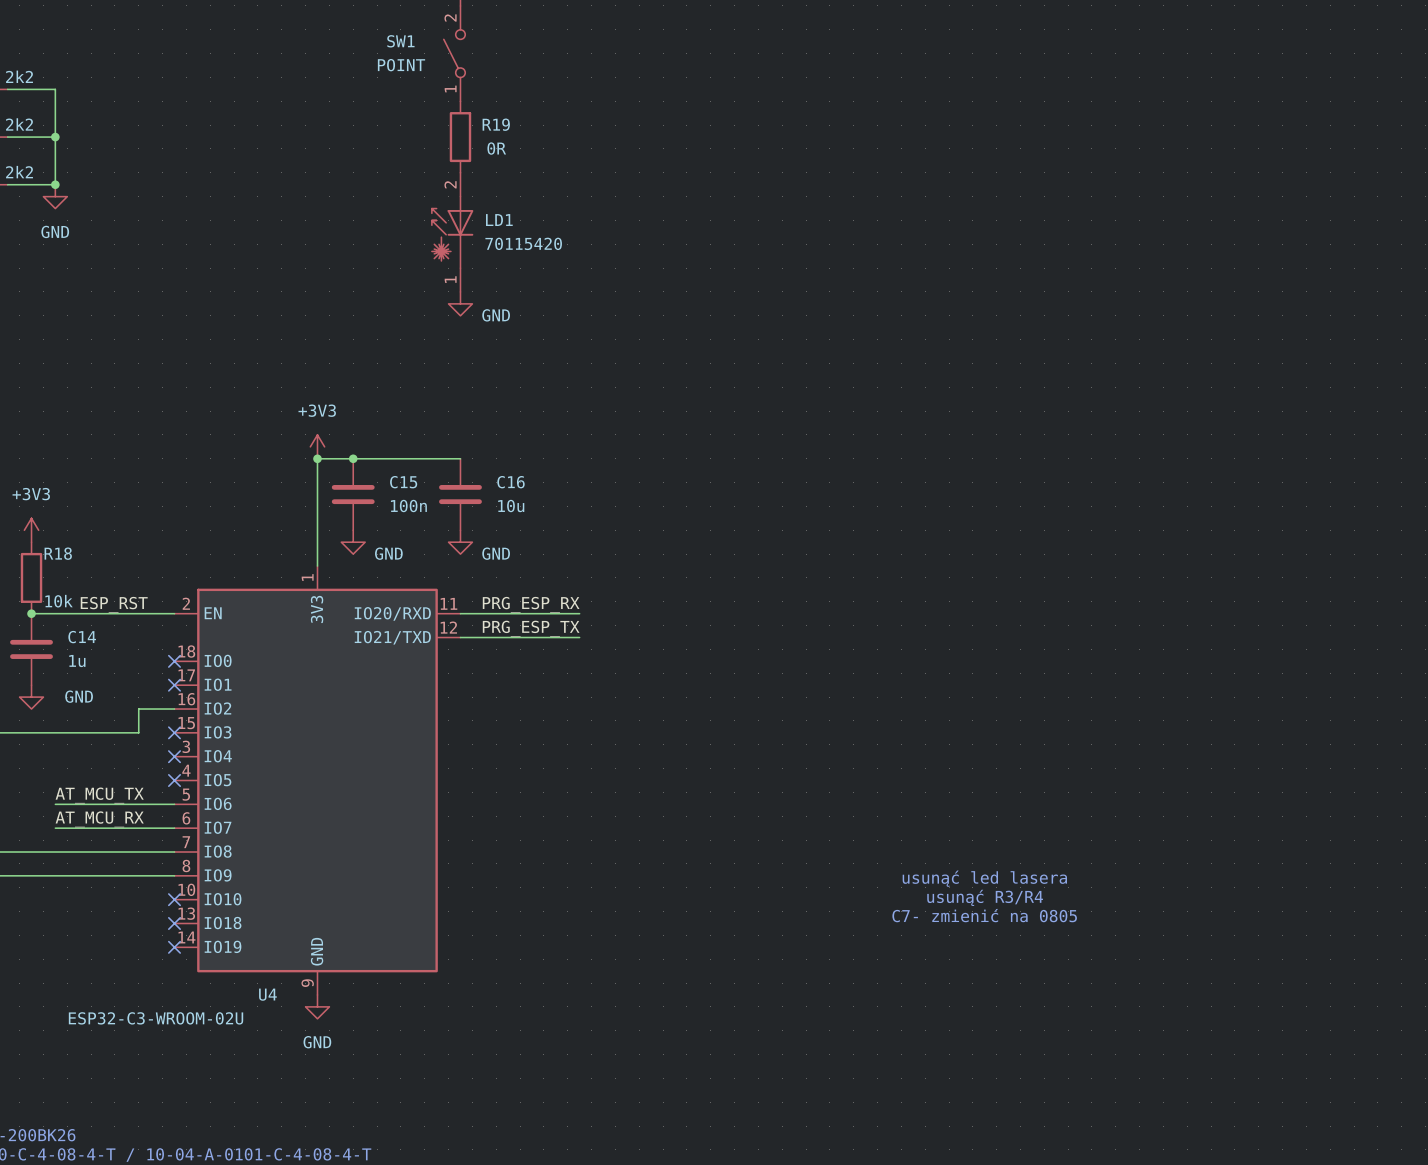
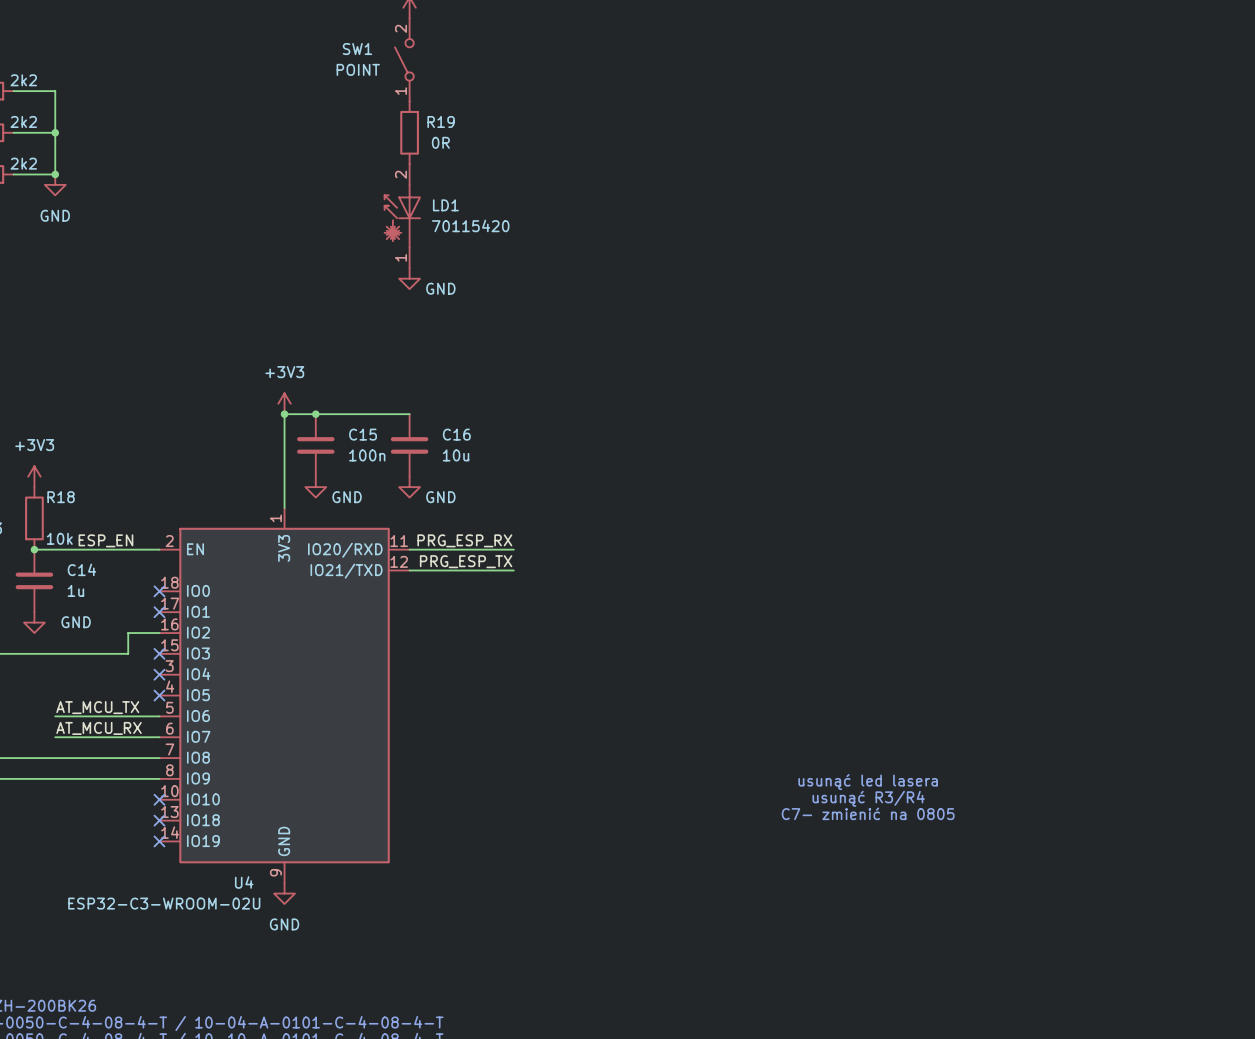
label: ESP_RST (114, 604) -> ESP_EN (105, 540)

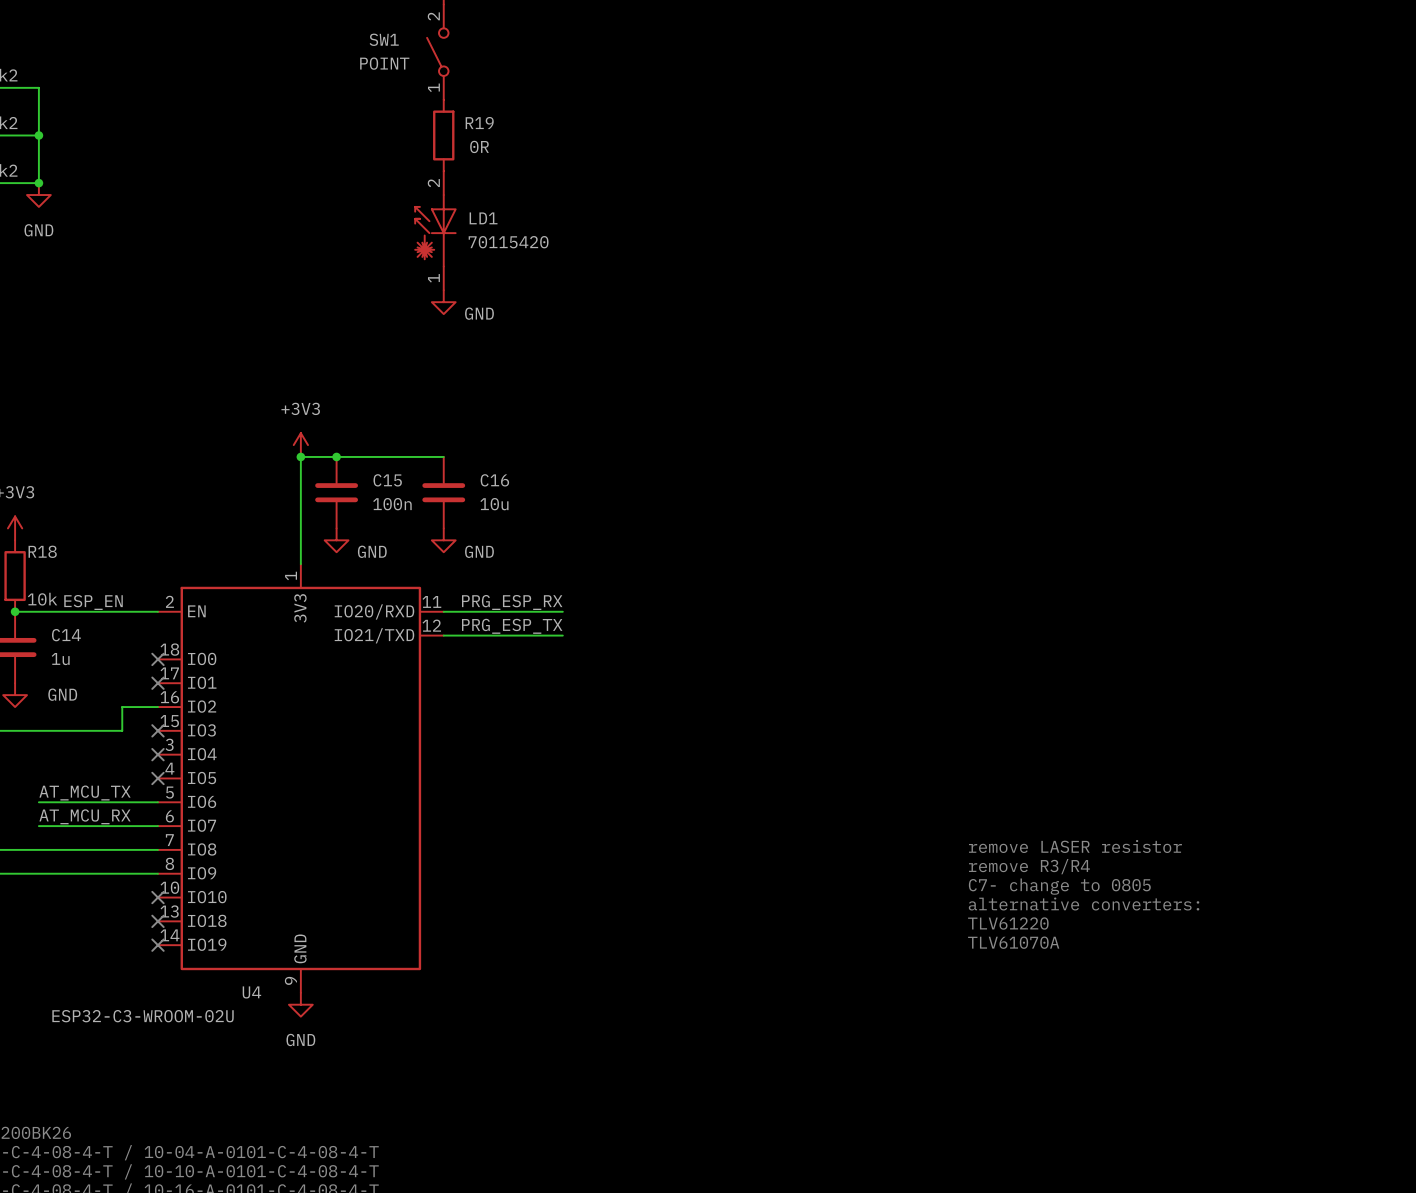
text: none -> remove LASER resistor (1075, 846)
text: none -> remove R3/R4 (1029, 866)
text: usunąć led lasera (868, 782) -> none
text: none -> C7- change to 0805 (1059, 886)
text: usunąć R3/R4 (868, 798) -> none
text: none -> alternative converters: (1084, 904)
text: C7- zmienić na 0805 (868, 813) -> none
text: none -> TLV61220 (1008, 923)
text: none -> TLV61070A (1013, 942)

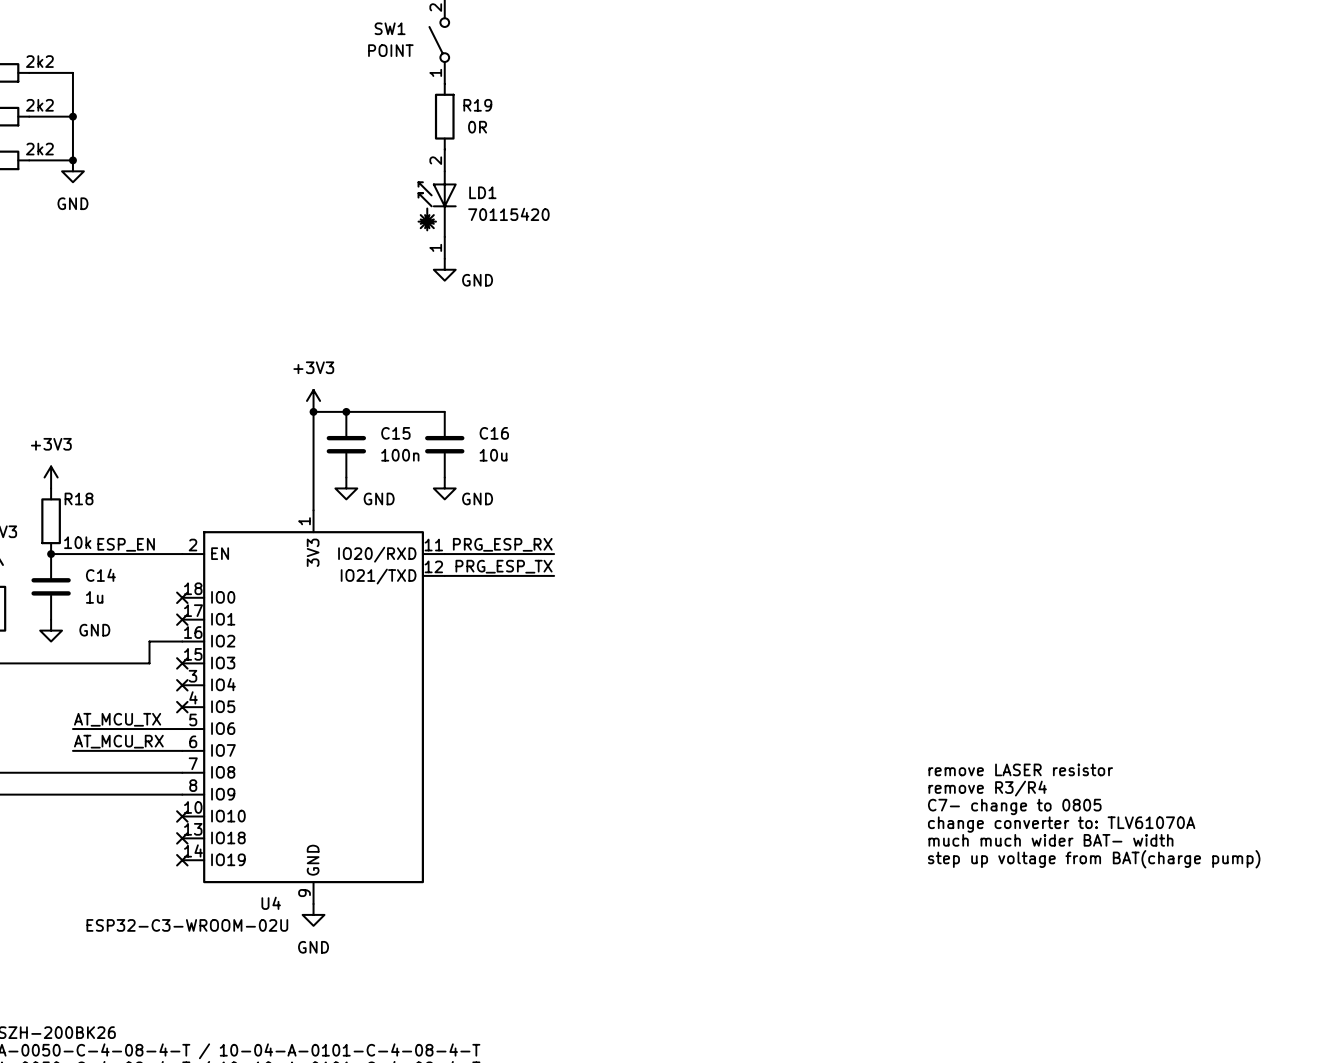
text: alternative converters: (1084, 904) -> change converter to: TLV61070A (1061, 824)
text: TLV61220 (1008, 923) -> much much wider BAT- width (1050, 840)
text: TLV61070A (1013, 942) -> step up voltage from BAT(charge pump) (1094, 859)

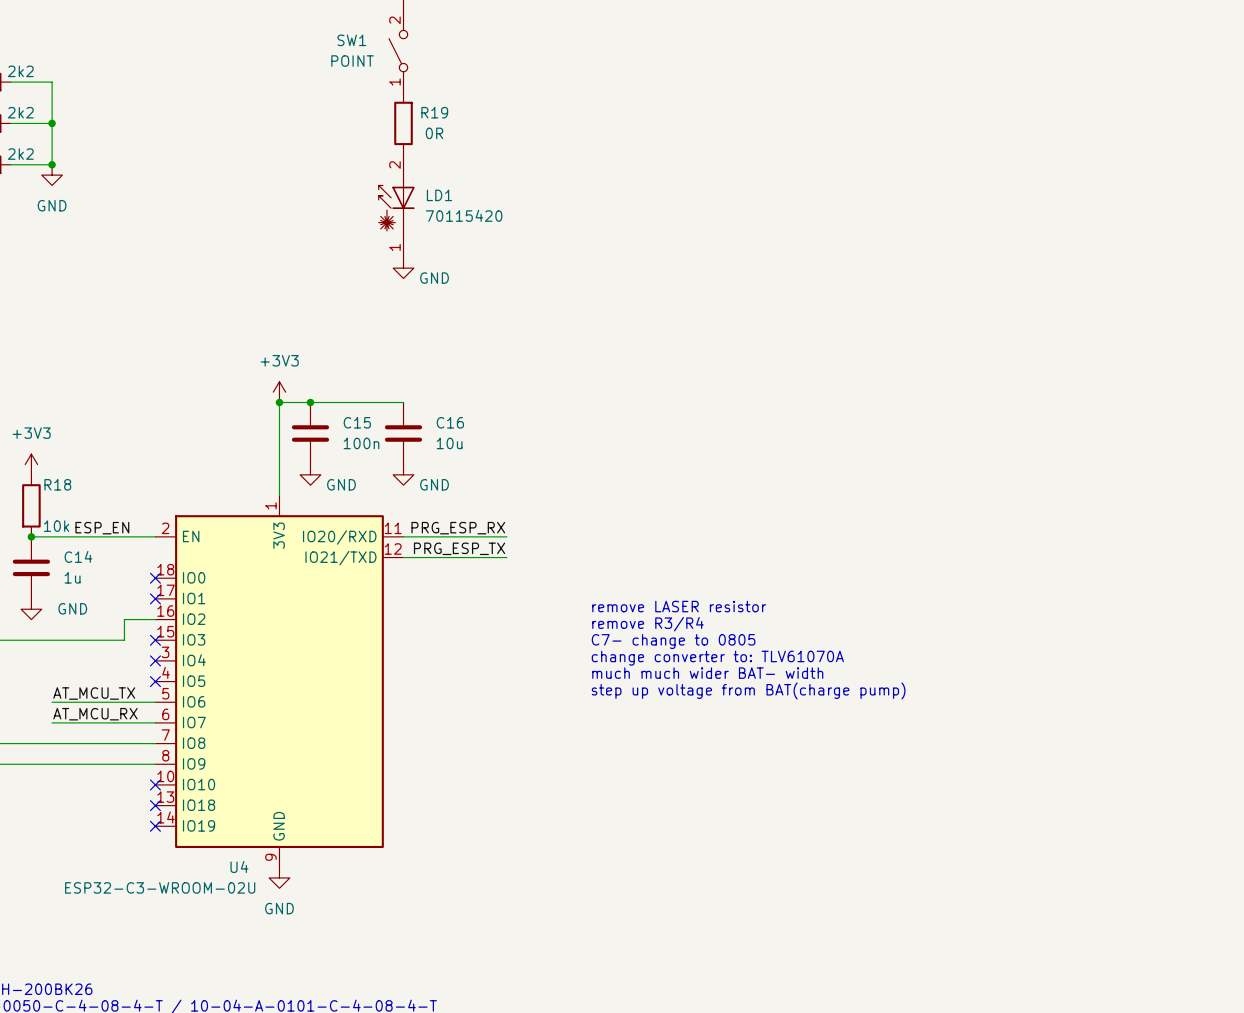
text: none -> remove LASER resistor (679, 606)
text: none -> remove R3/R4 (647, 624)
text: none -> C7- change to 0805 (673, 641)
text: none -> change converter to: TLV61070A (717, 658)
text: none -> much much wider BAT- width (707, 673)
text: none -> step up voltage from BAT(charge pump) (748, 690)
text: remove LASER resistor (1020, 769) -> none
text: remove R3/R4 (987, 788) -> none
text: C7- change to 0805 (1014, 806) -> none
text: change converter to: TLV61070A (1061, 824) -> none
text: much much wider BAT- width (1050, 840) -> none
text: step up voltage from BAT(charge pump) (1094, 859) -> none

